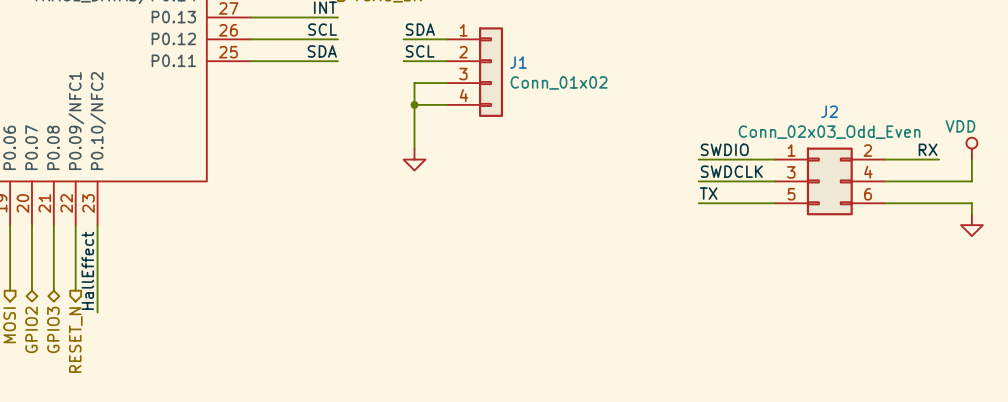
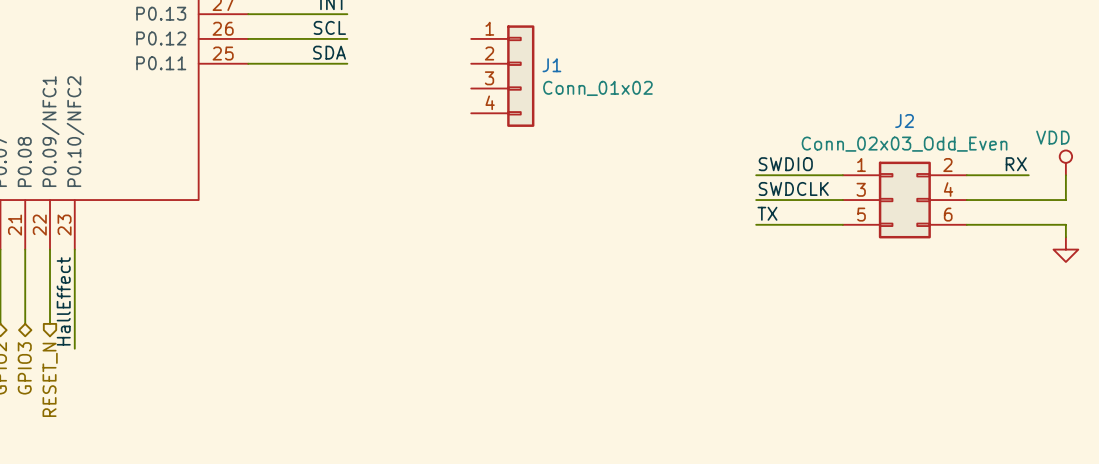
label: SDA (420, 29) -> none
wire: (403, 39) (447, 39) -> none
label: SCL (420, 51) -> none
wire: (403, 61) (447, 61) -> none
wire: (447, 83) (414, 83) (414, 148) -> none
wire: (414, 104) (447, 104) -> none
junction: (414, 104) -> none
power symbol: (414, 159) -> none

